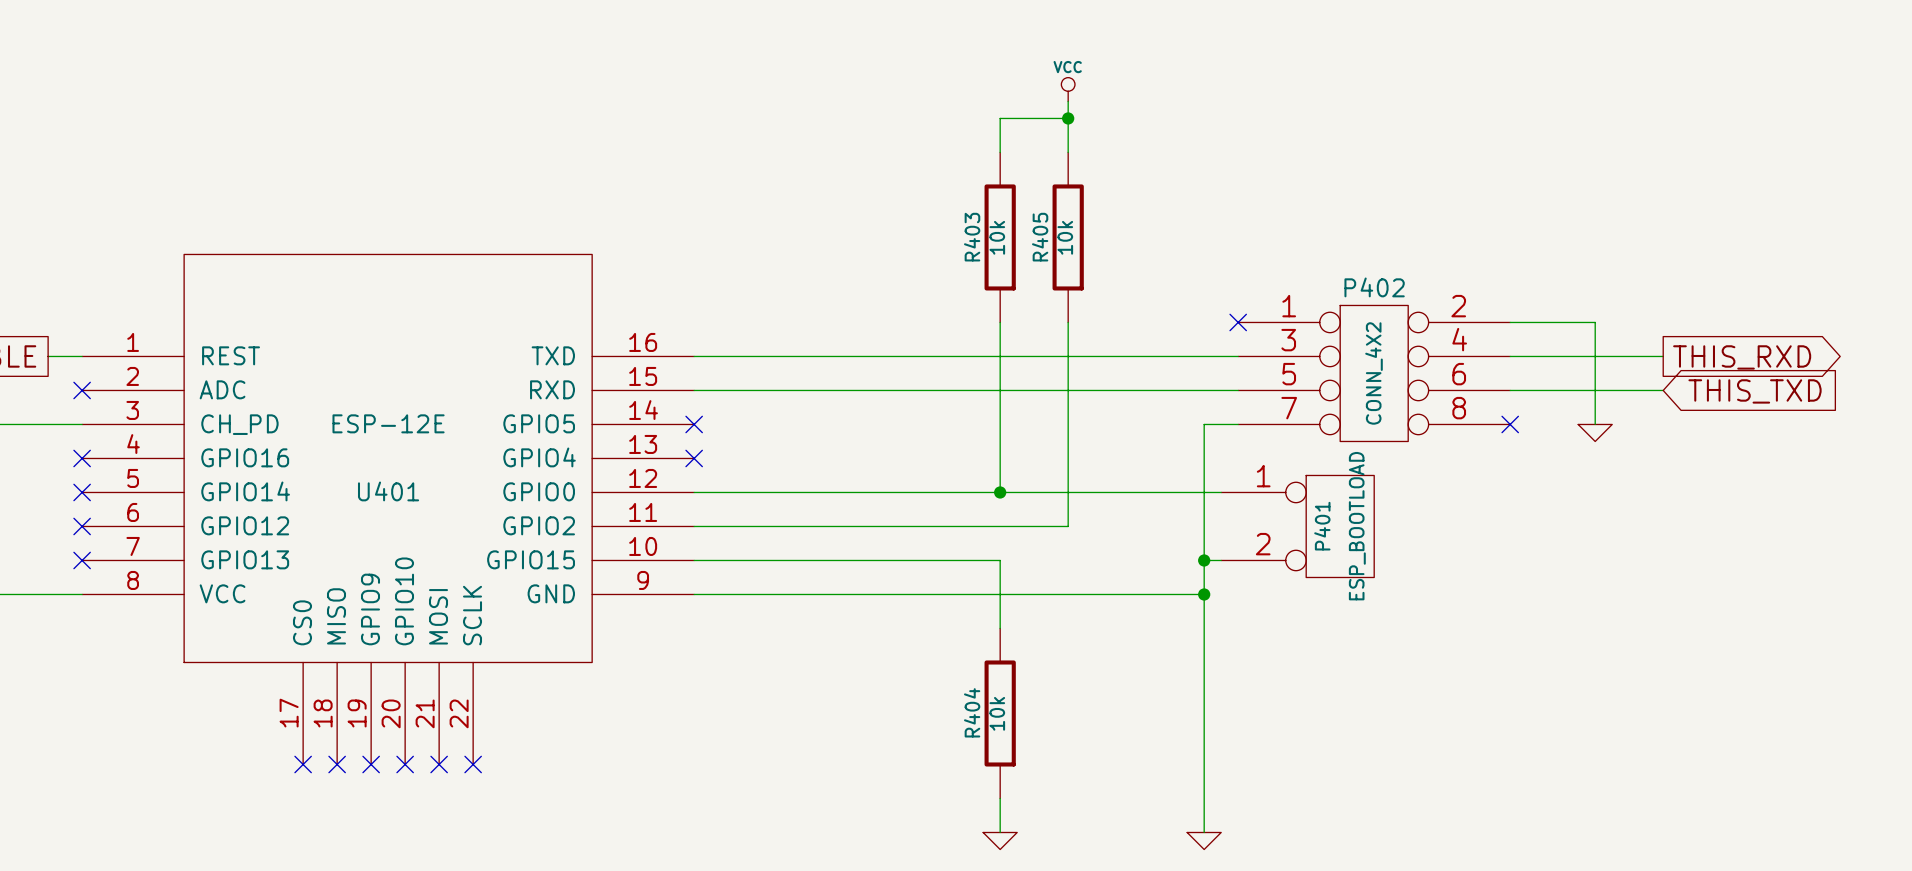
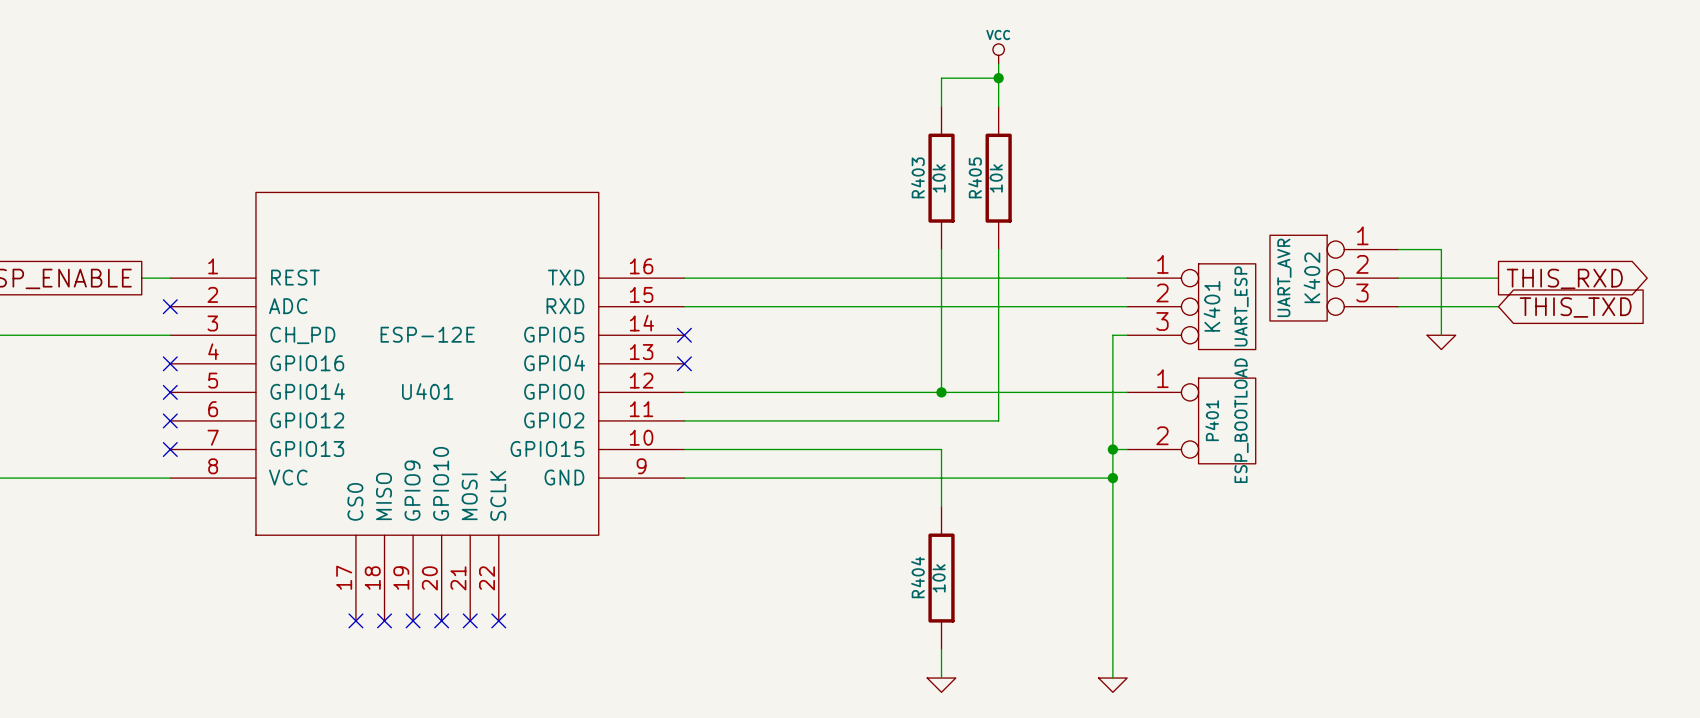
no-connect mark: (1238, 322) -> none
K402: none -> UART_AVR (1334, 278)
P402: CONN_4X2 (1374, 373) -> none
K401: none -> UART_ESP (1191, 306)
no-connect mark: (1510, 424) -> none

